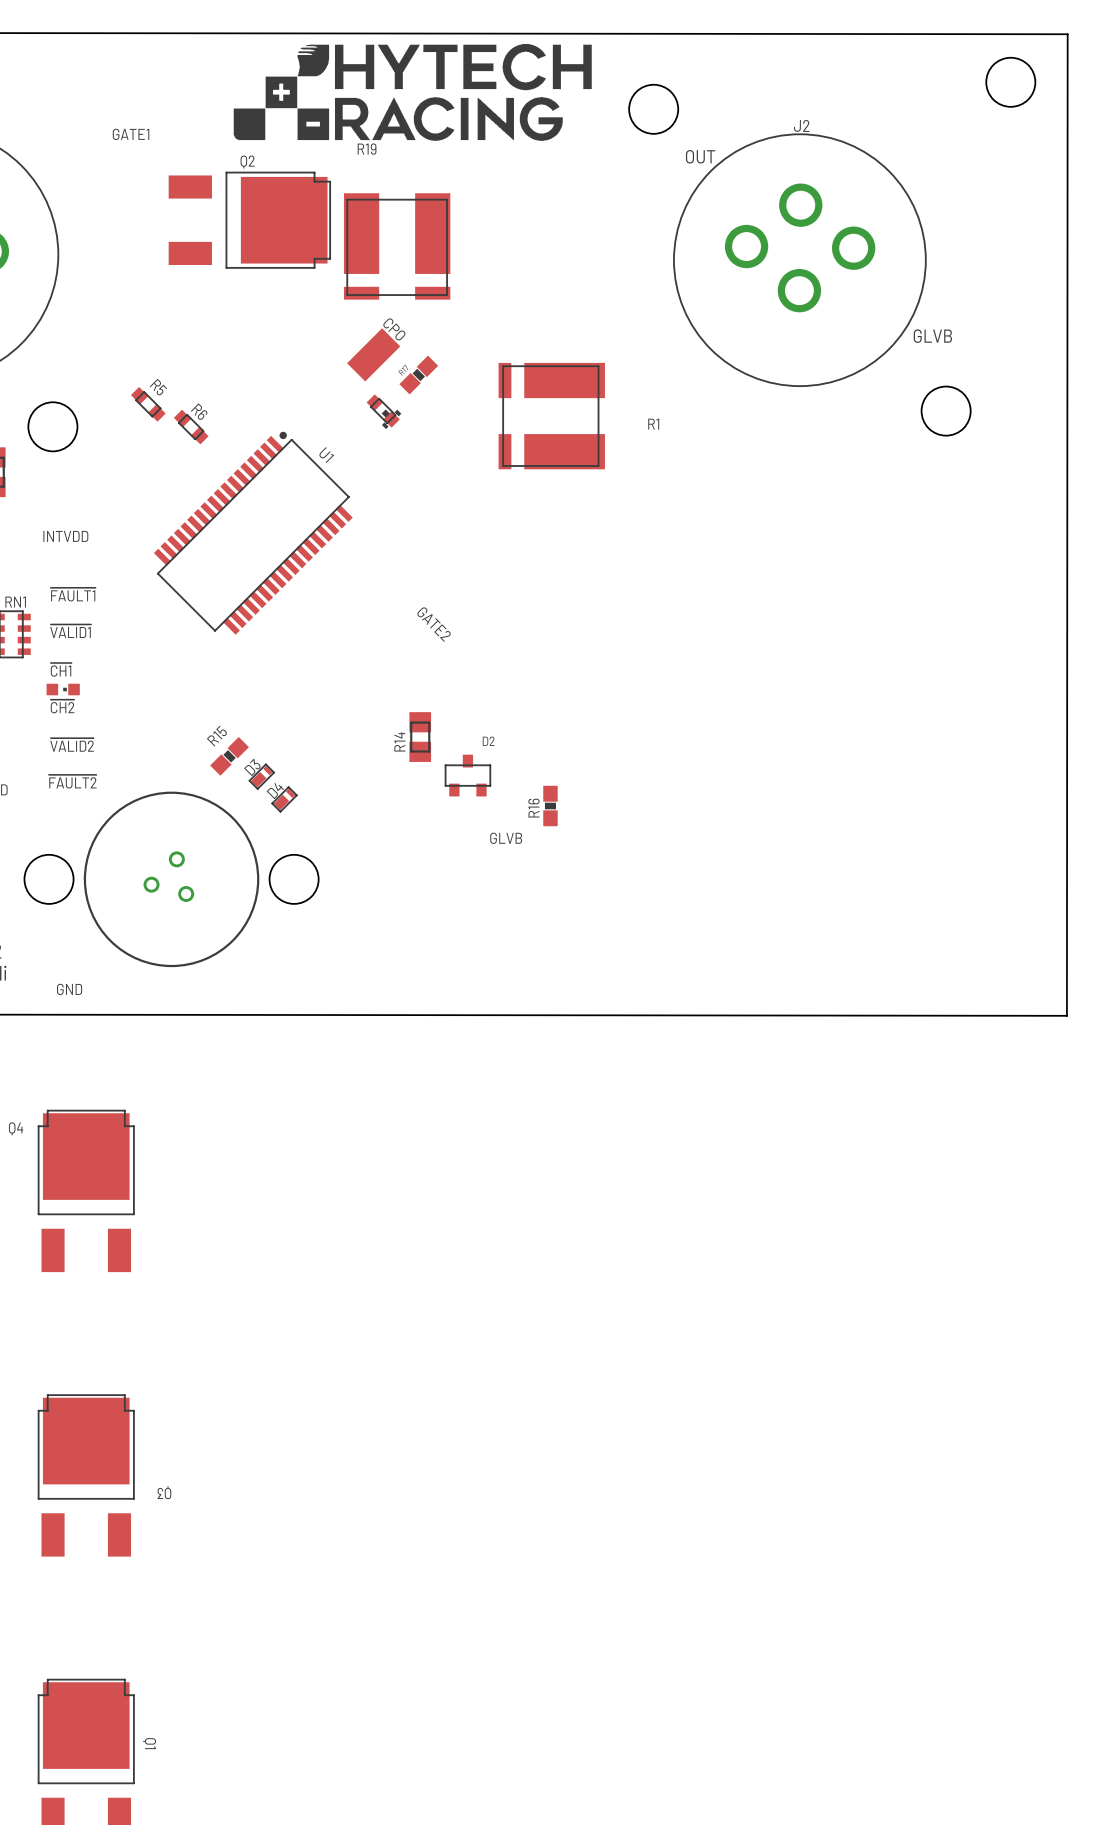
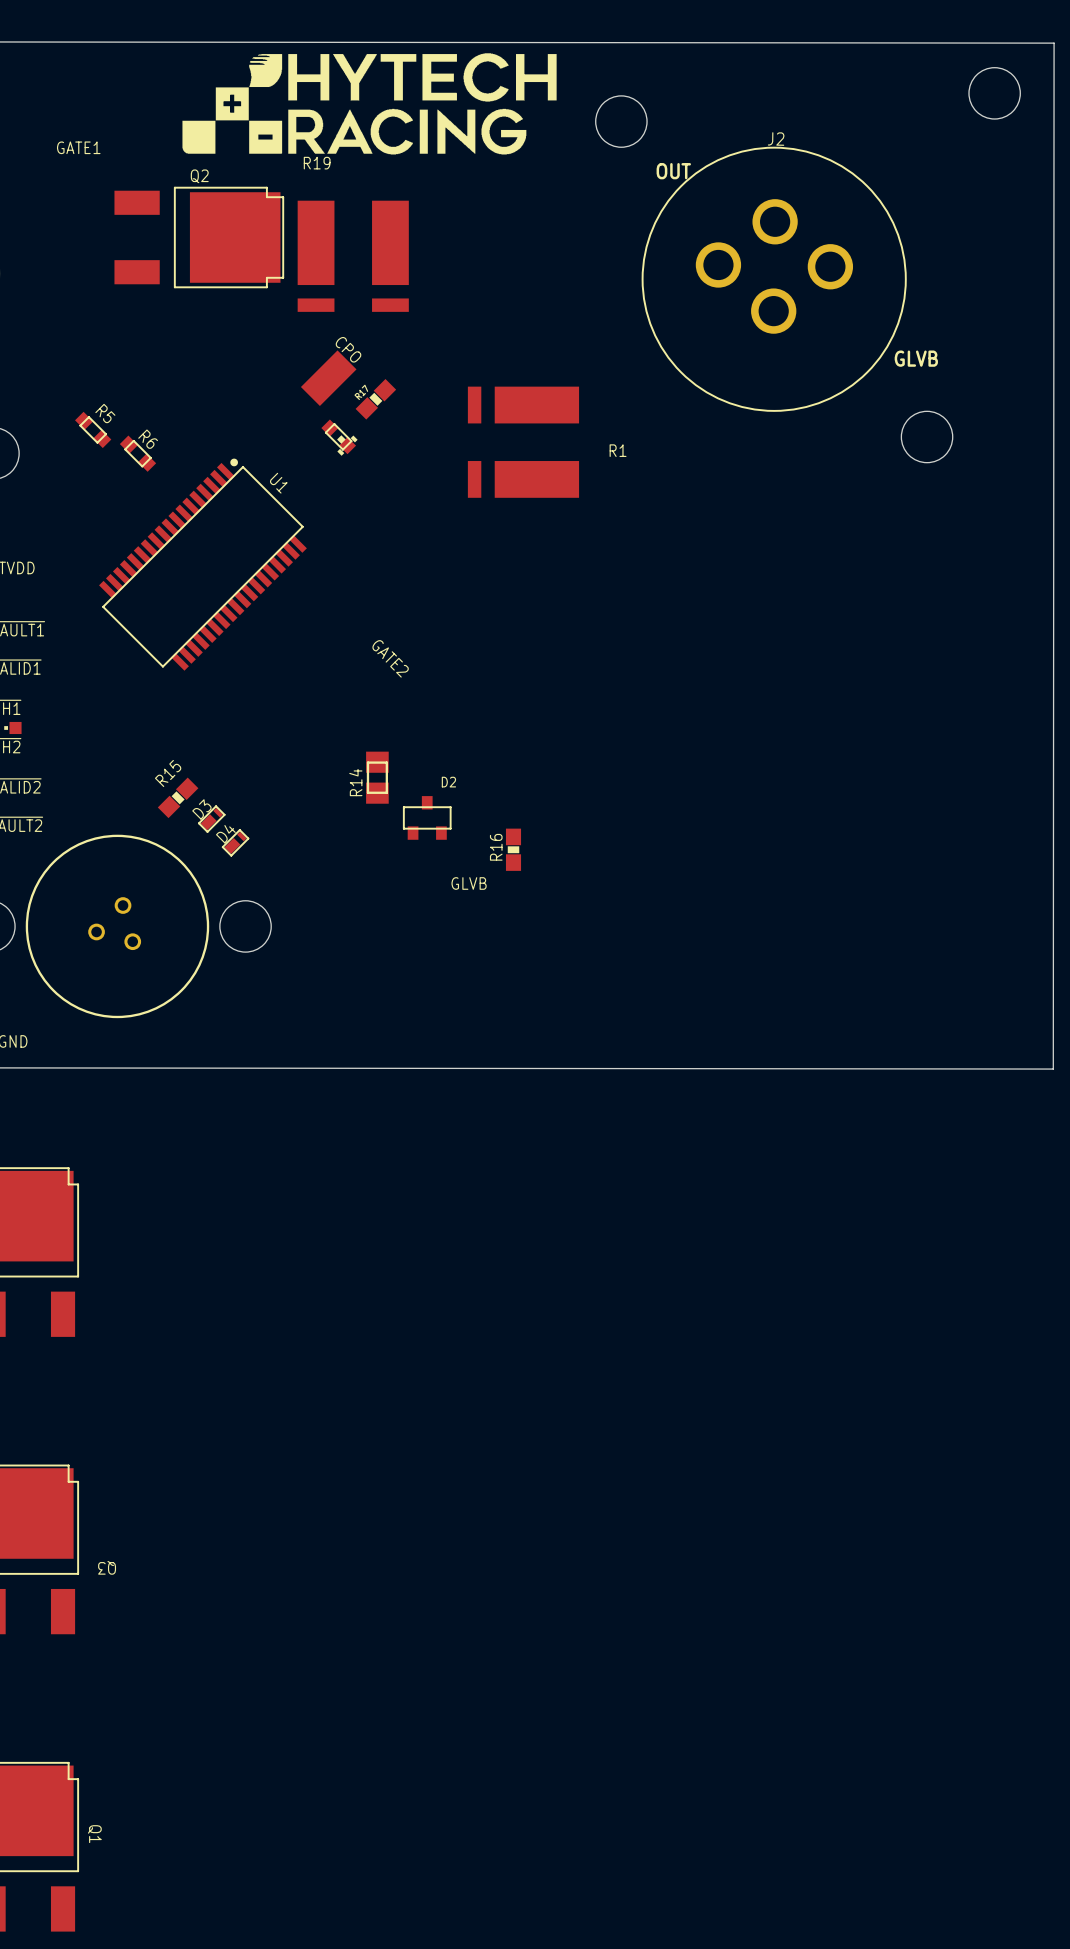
R19 footprint: [343, 193, 451, 300] -> [297, 200, 409, 312]
R1 footprint: [498, 362, 605, 470] -> [467, 386, 580, 498]

